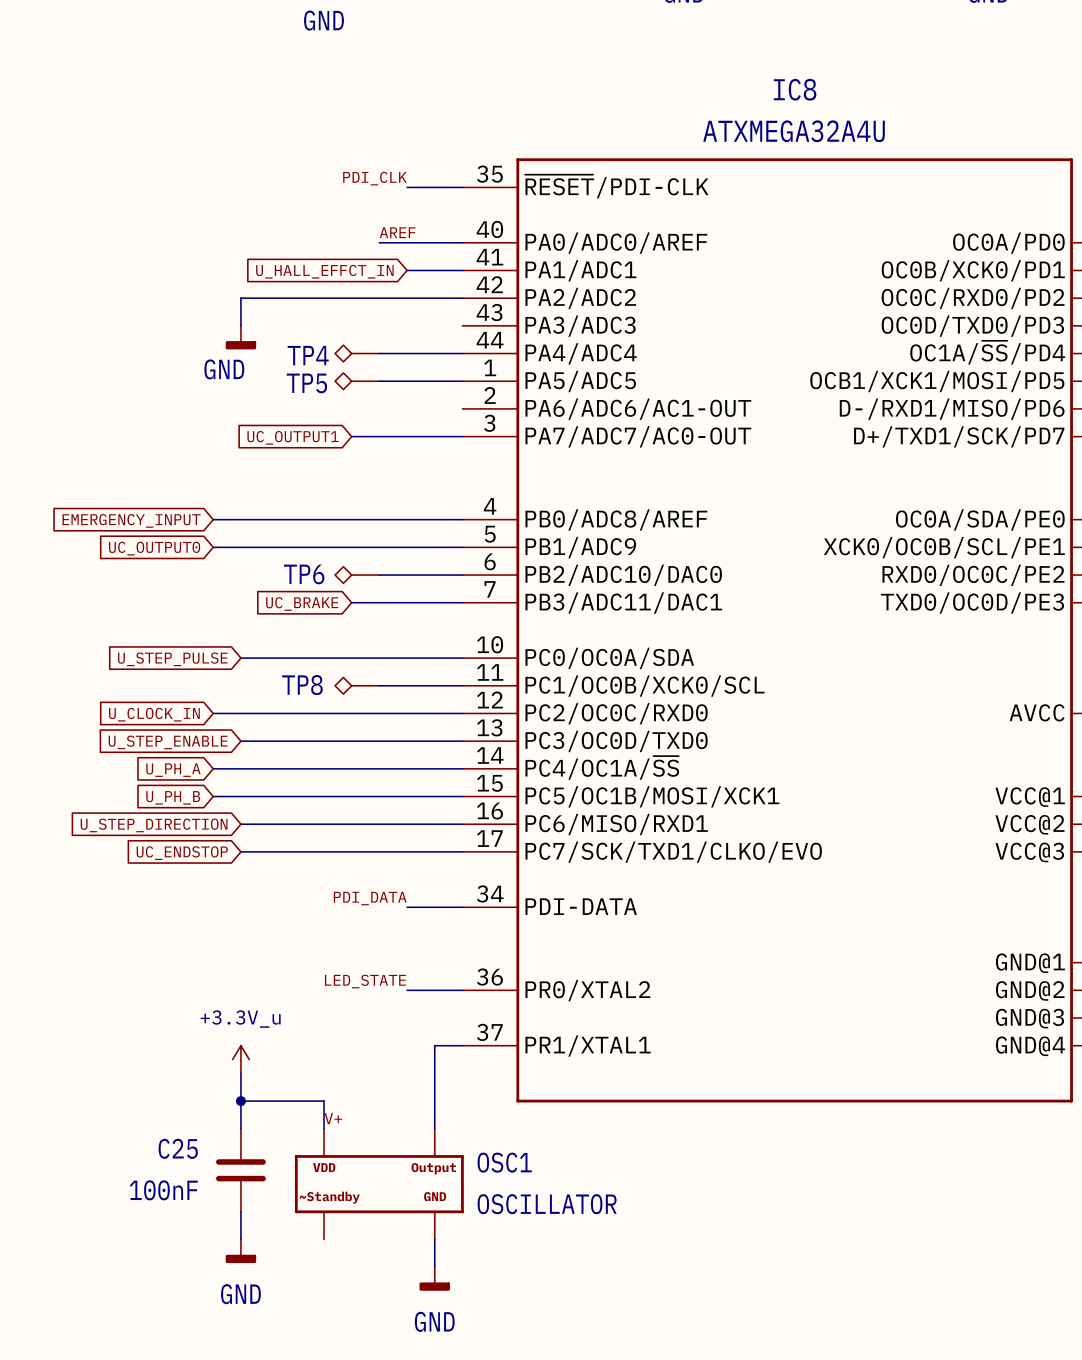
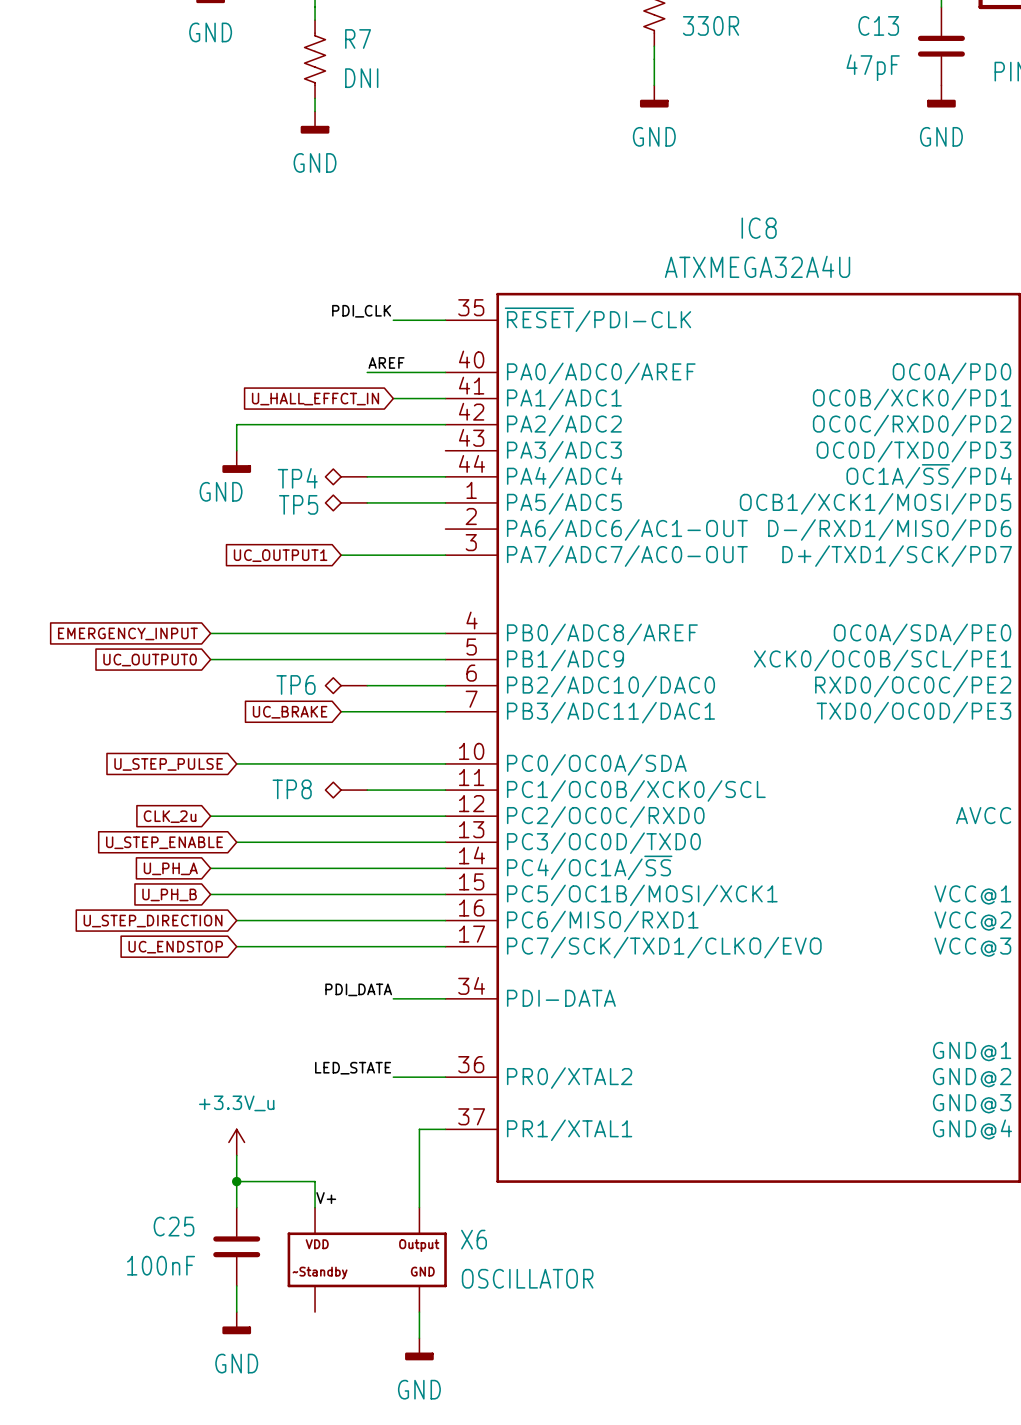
global label: U_CLOCK_IN (154, 714) -> CLK_2u (170, 816)
OSC1 name: OSC1 (504, 1162) -> X6 (474, 1239)

